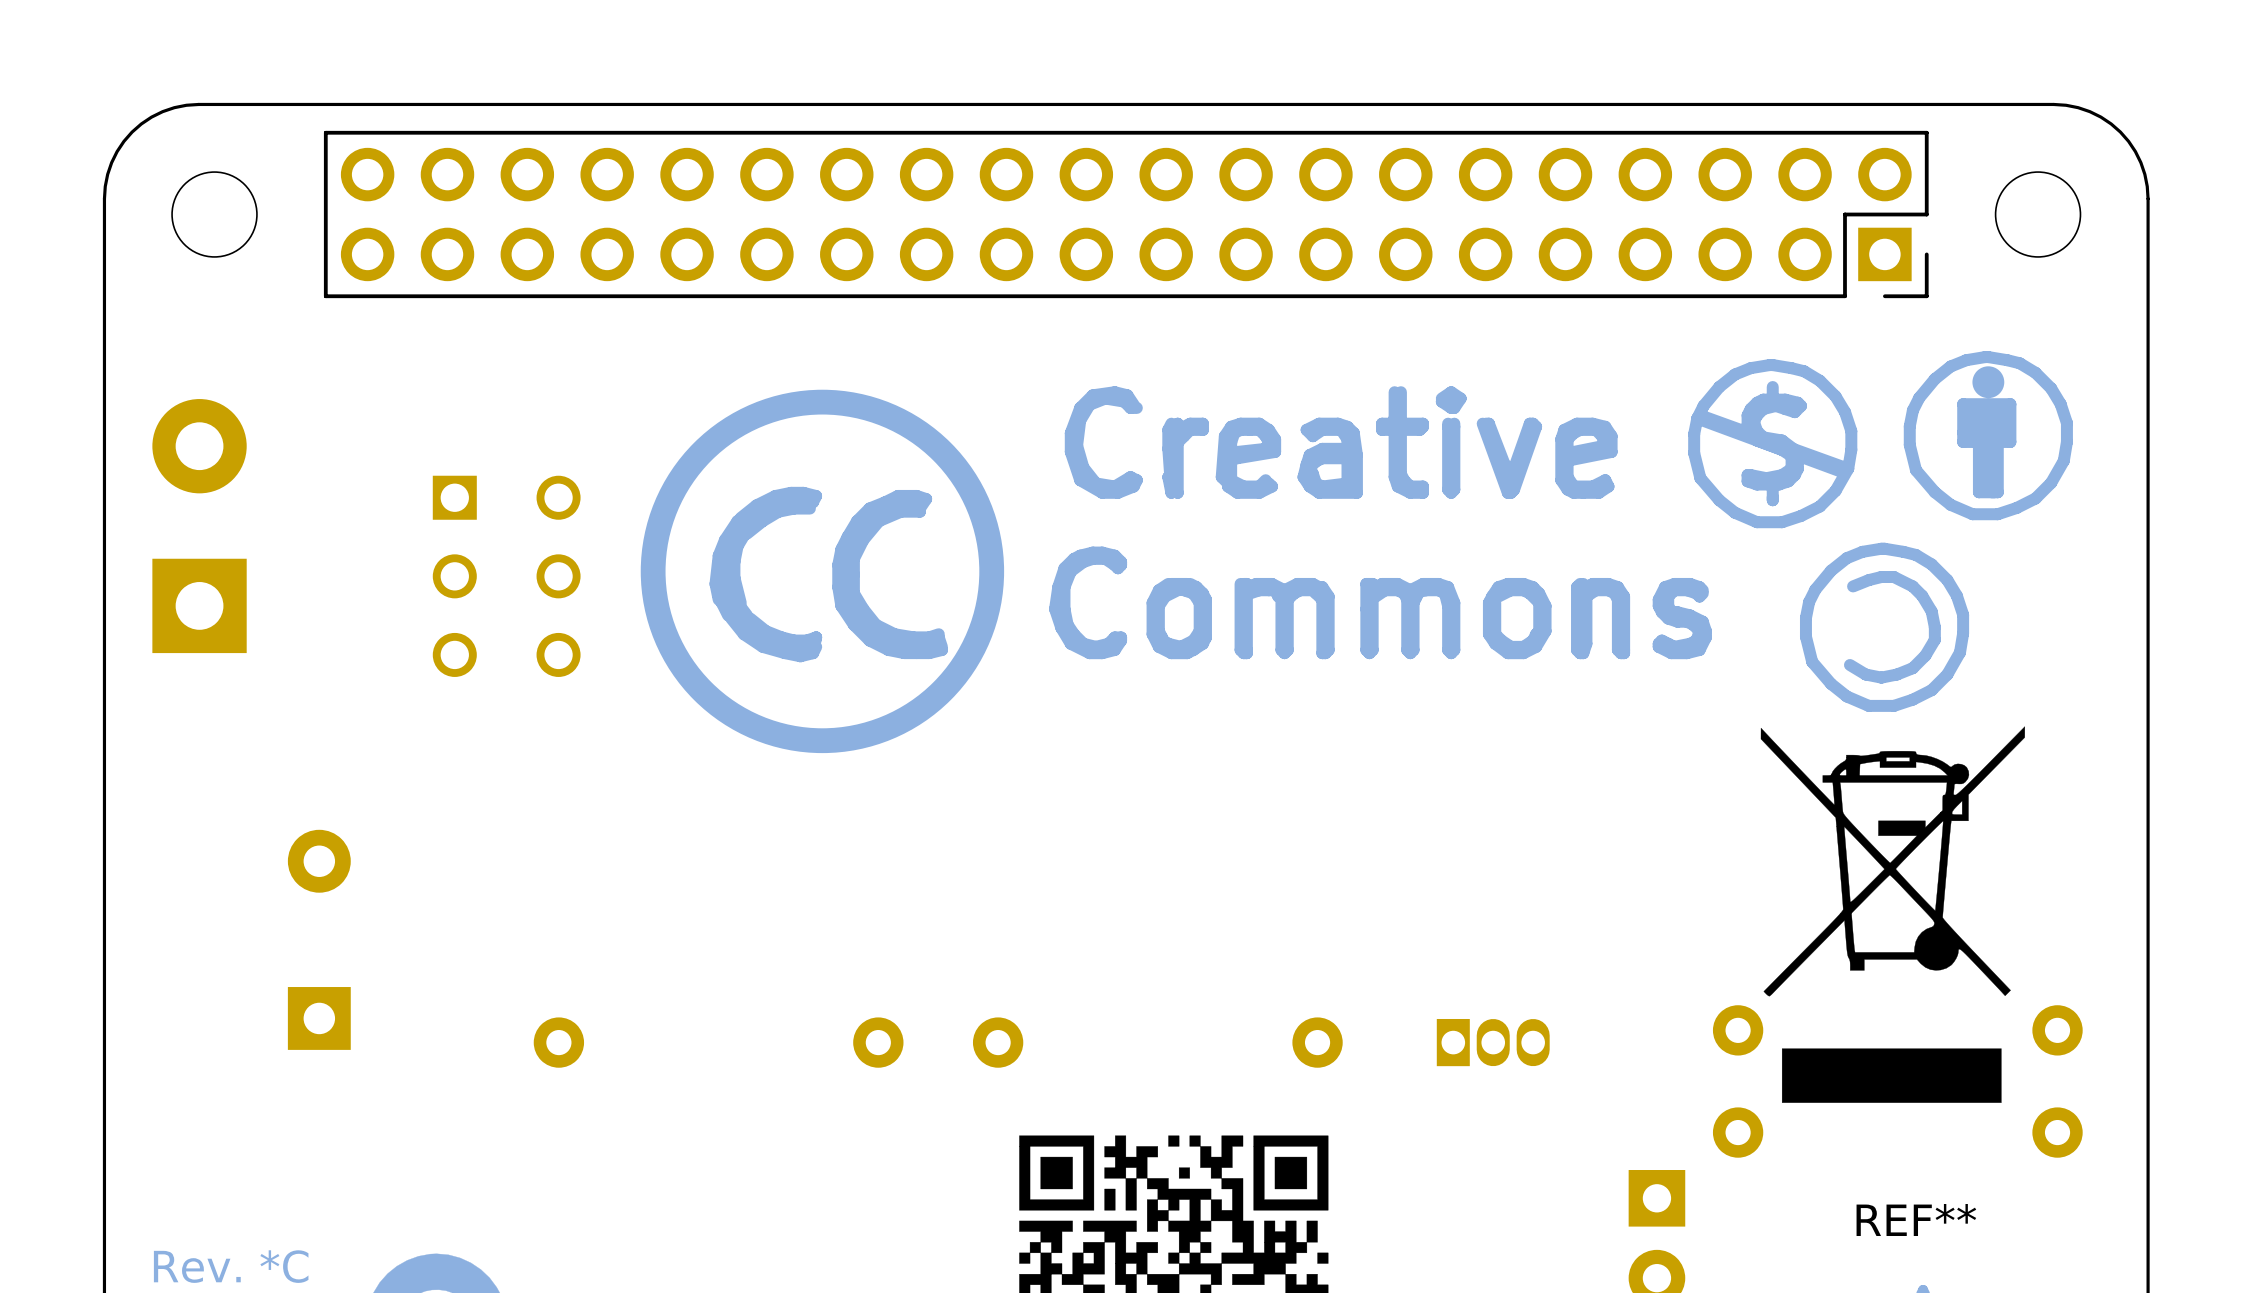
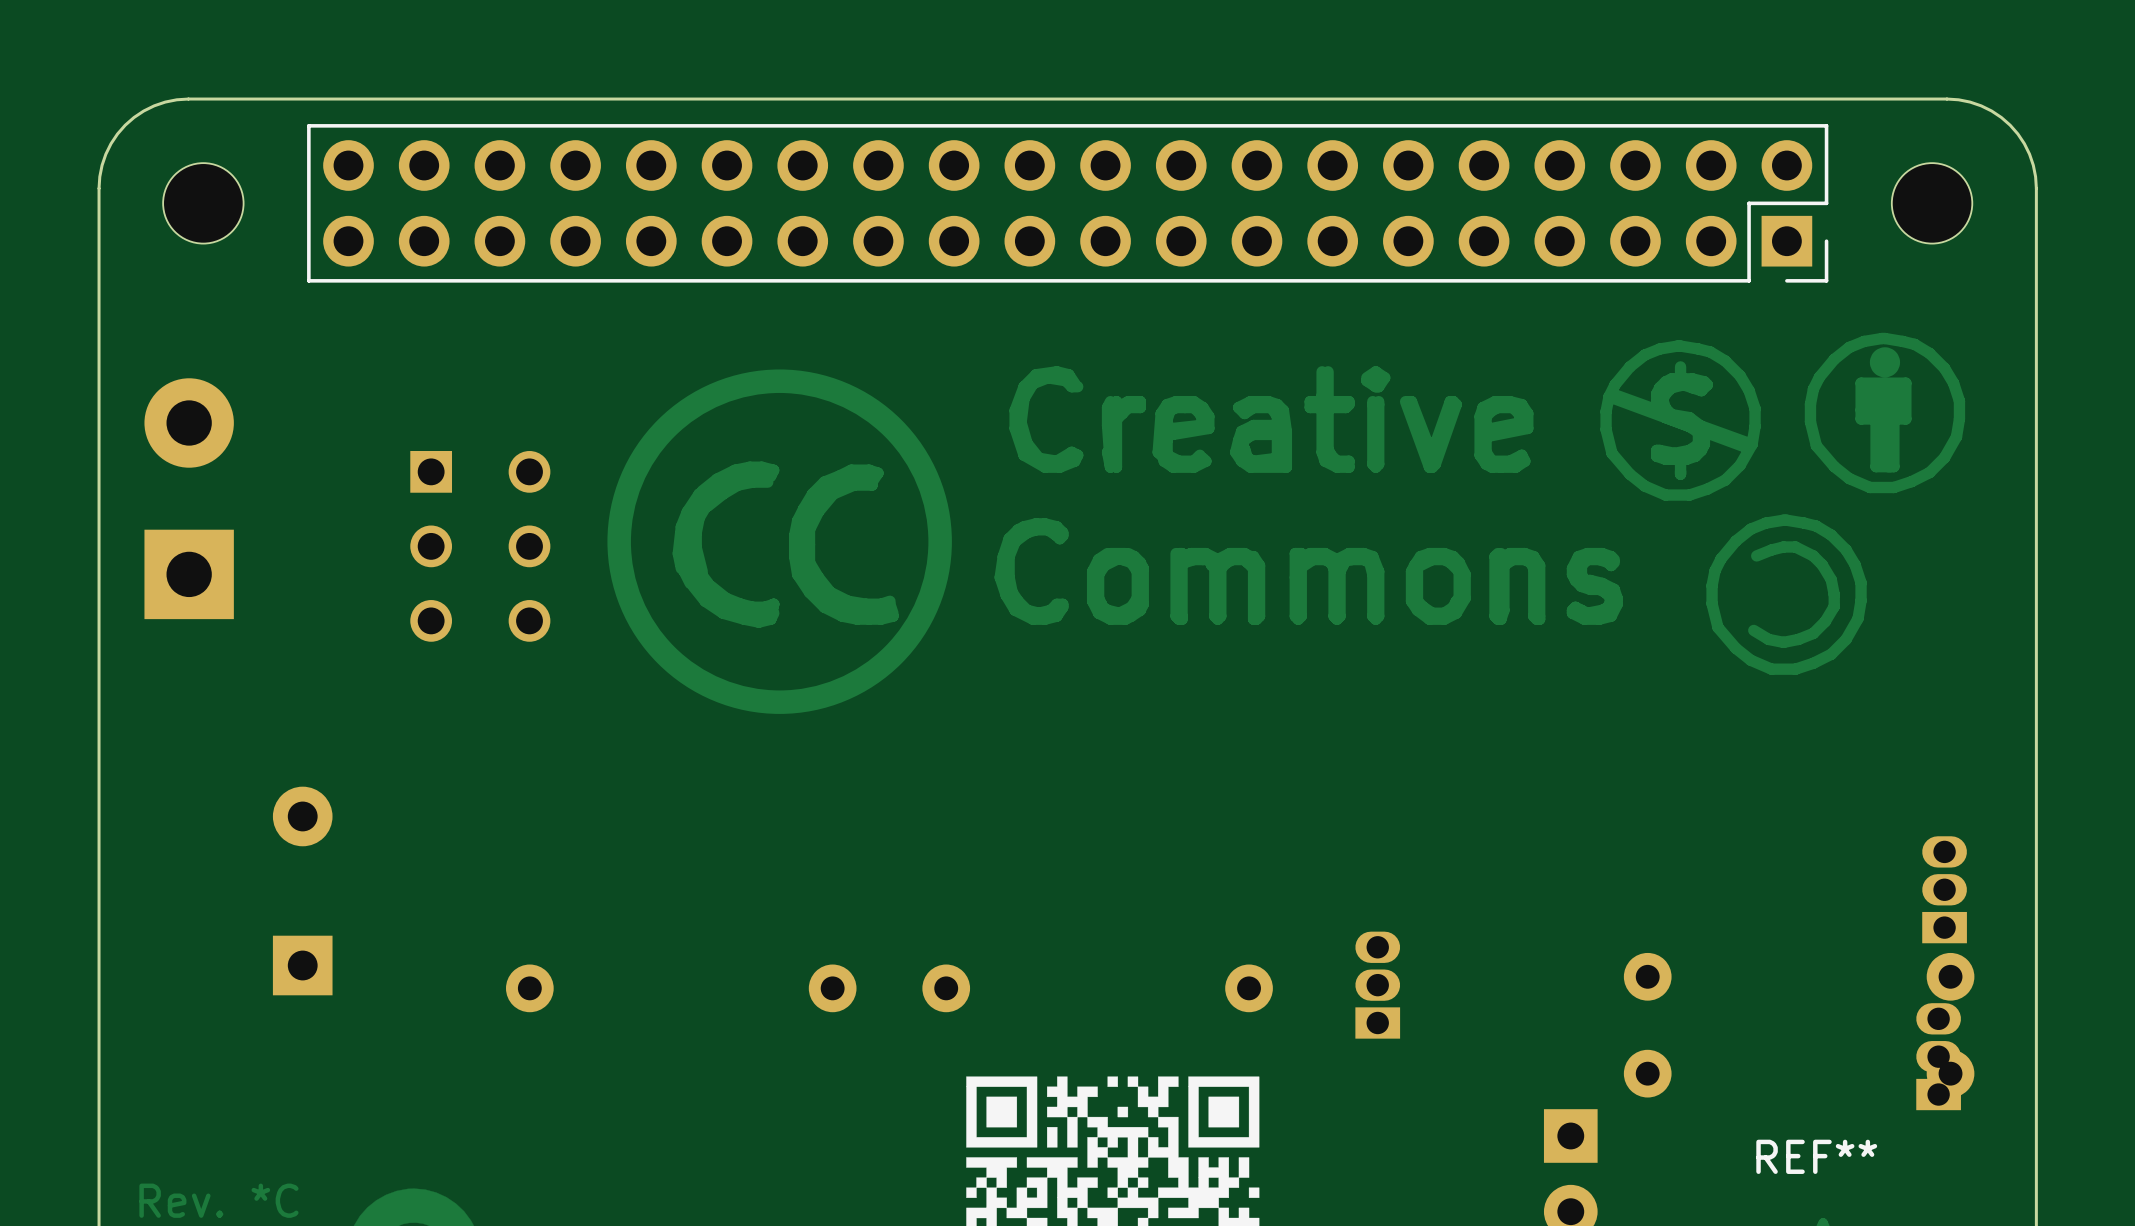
drawing: [1760, 726, 2026, 1103] -> none
part: none -> (1944, 889)
part rotation: 0° (1493, 1042) -> 90° counterclockwise (1377, 985)
part: none -> (1938, 1056)

